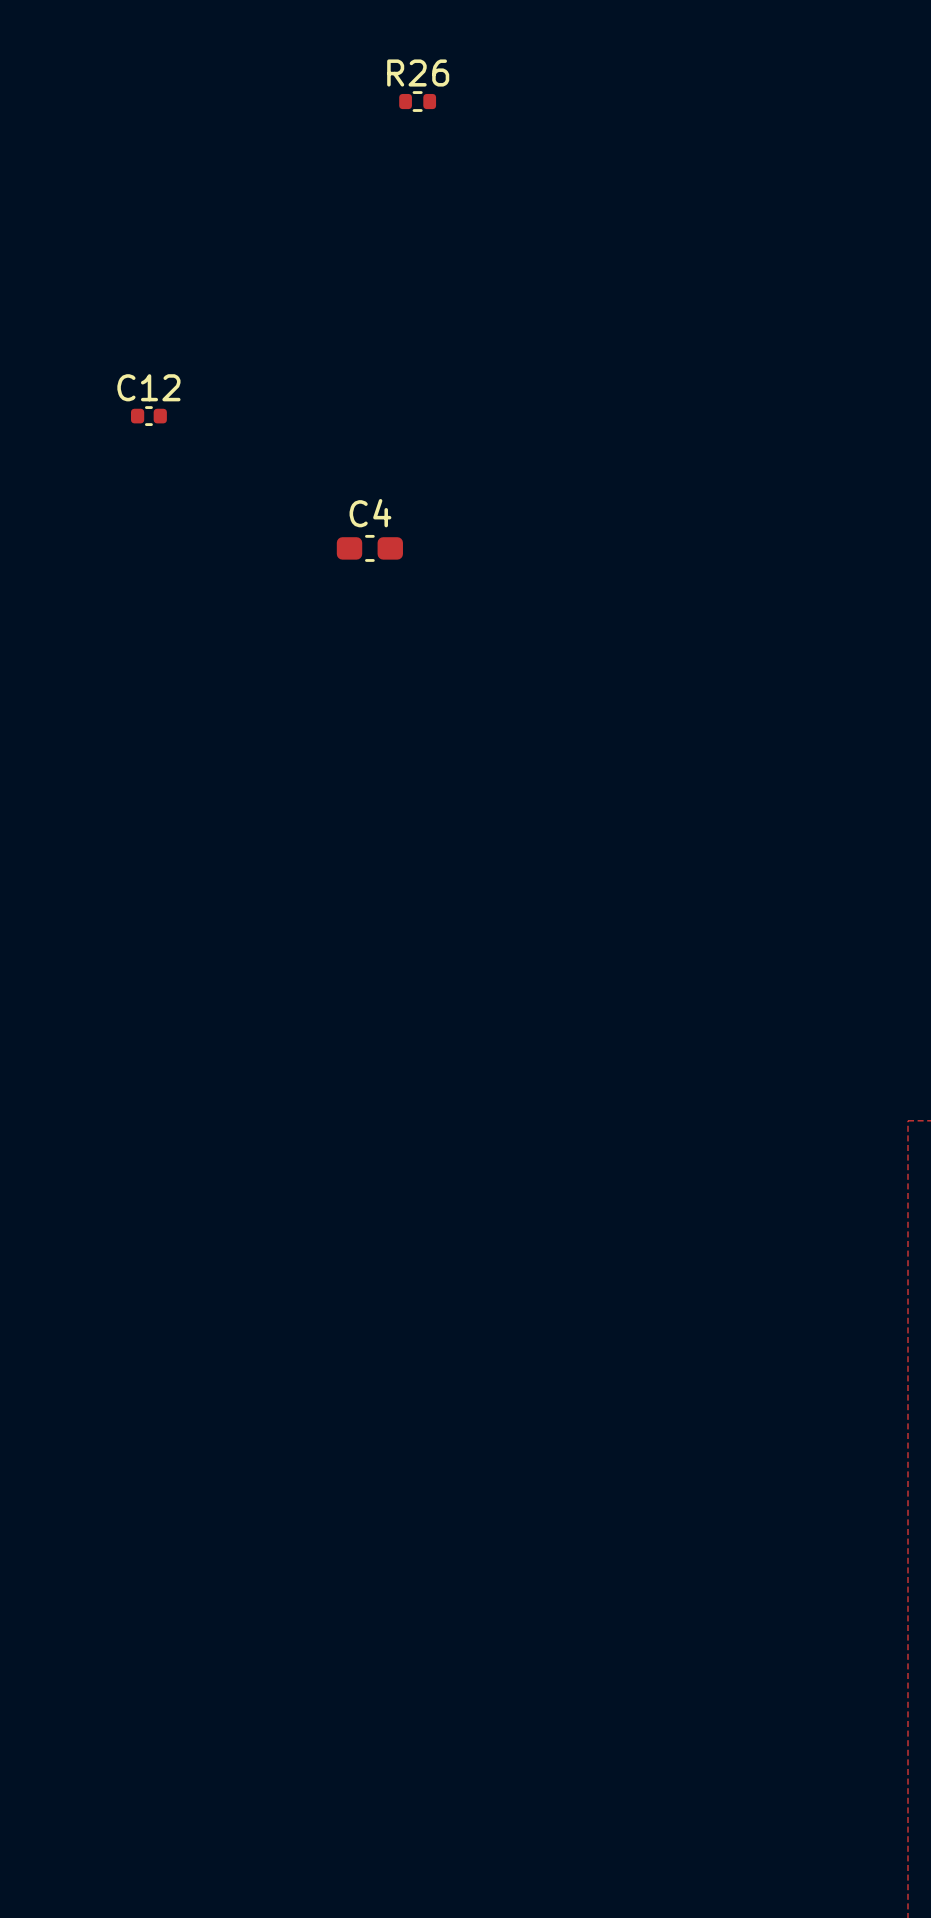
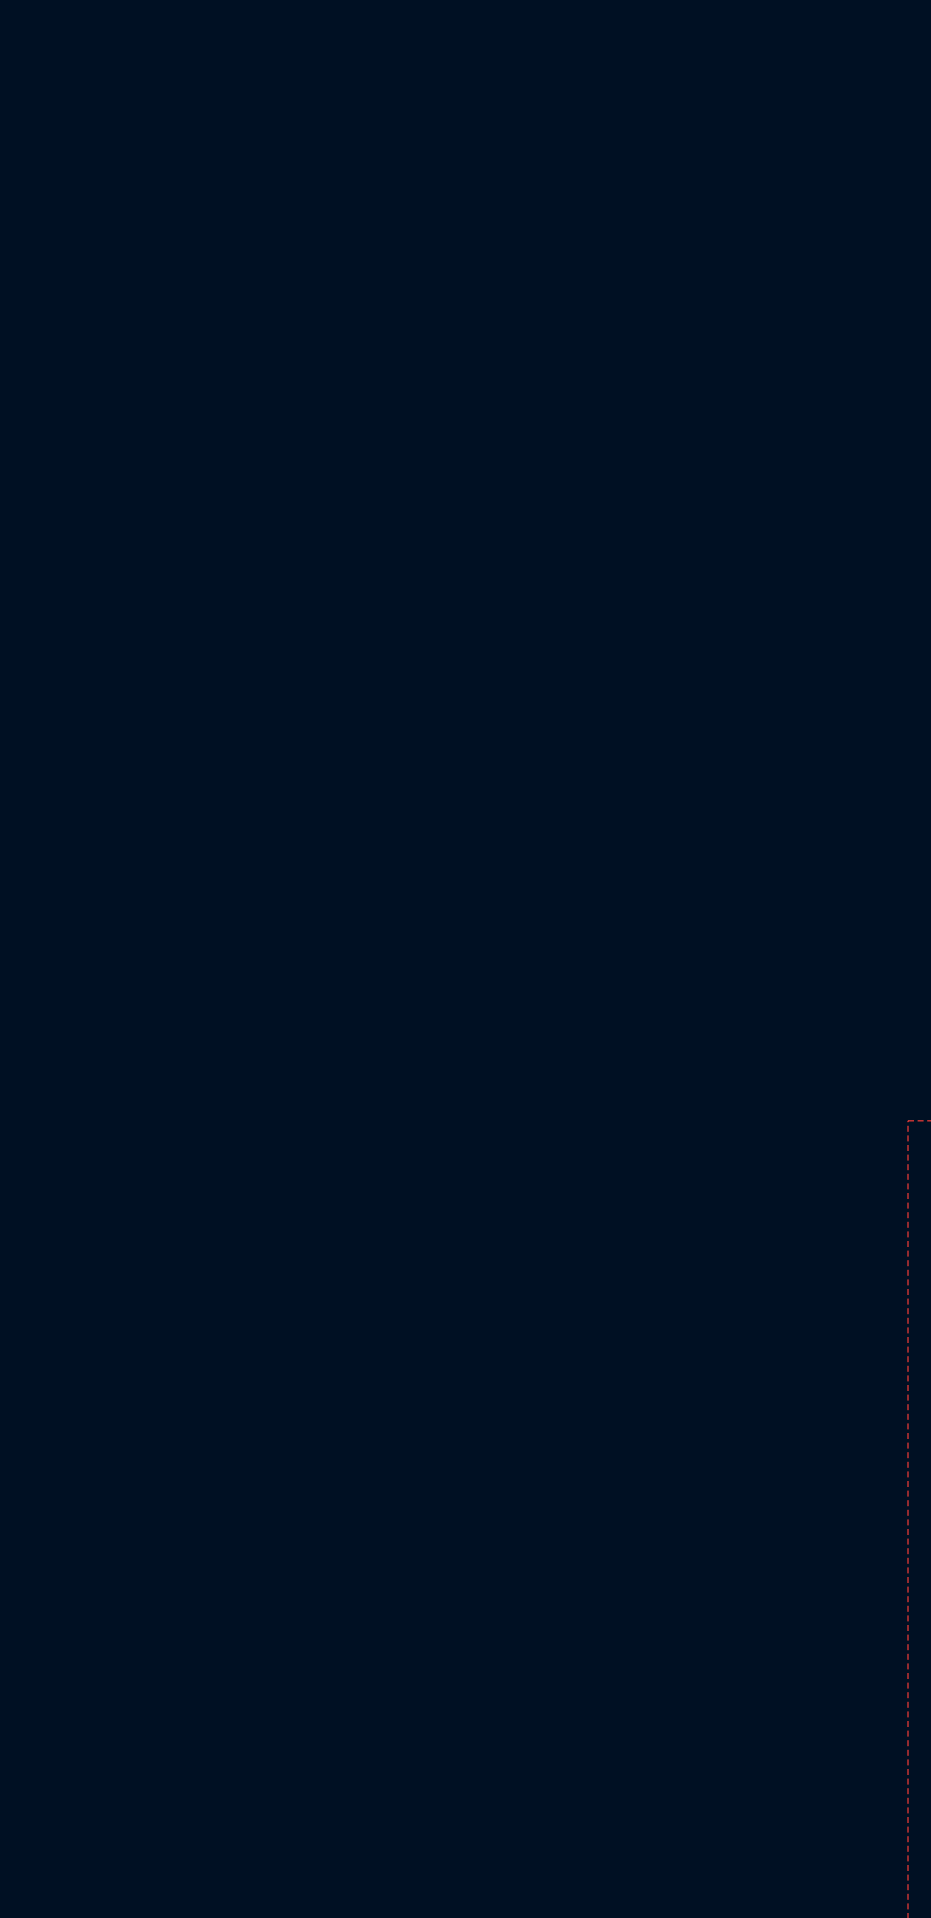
R26: (417, 101) -> none
C12: (148, 416) -> none
C4: (369, 548) -> none

